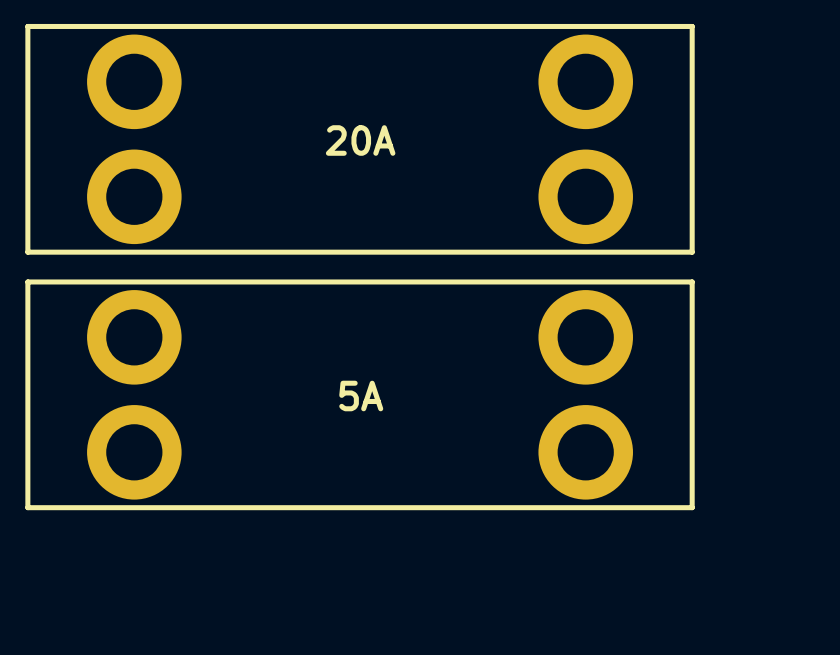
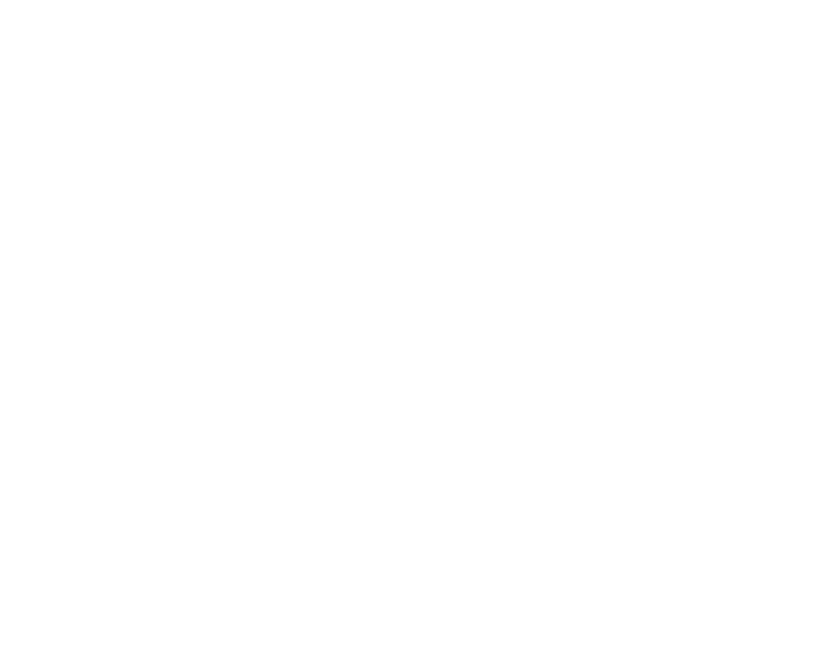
part: 20A (360, 139) -> none
part: 5A (360, 394) -> none

